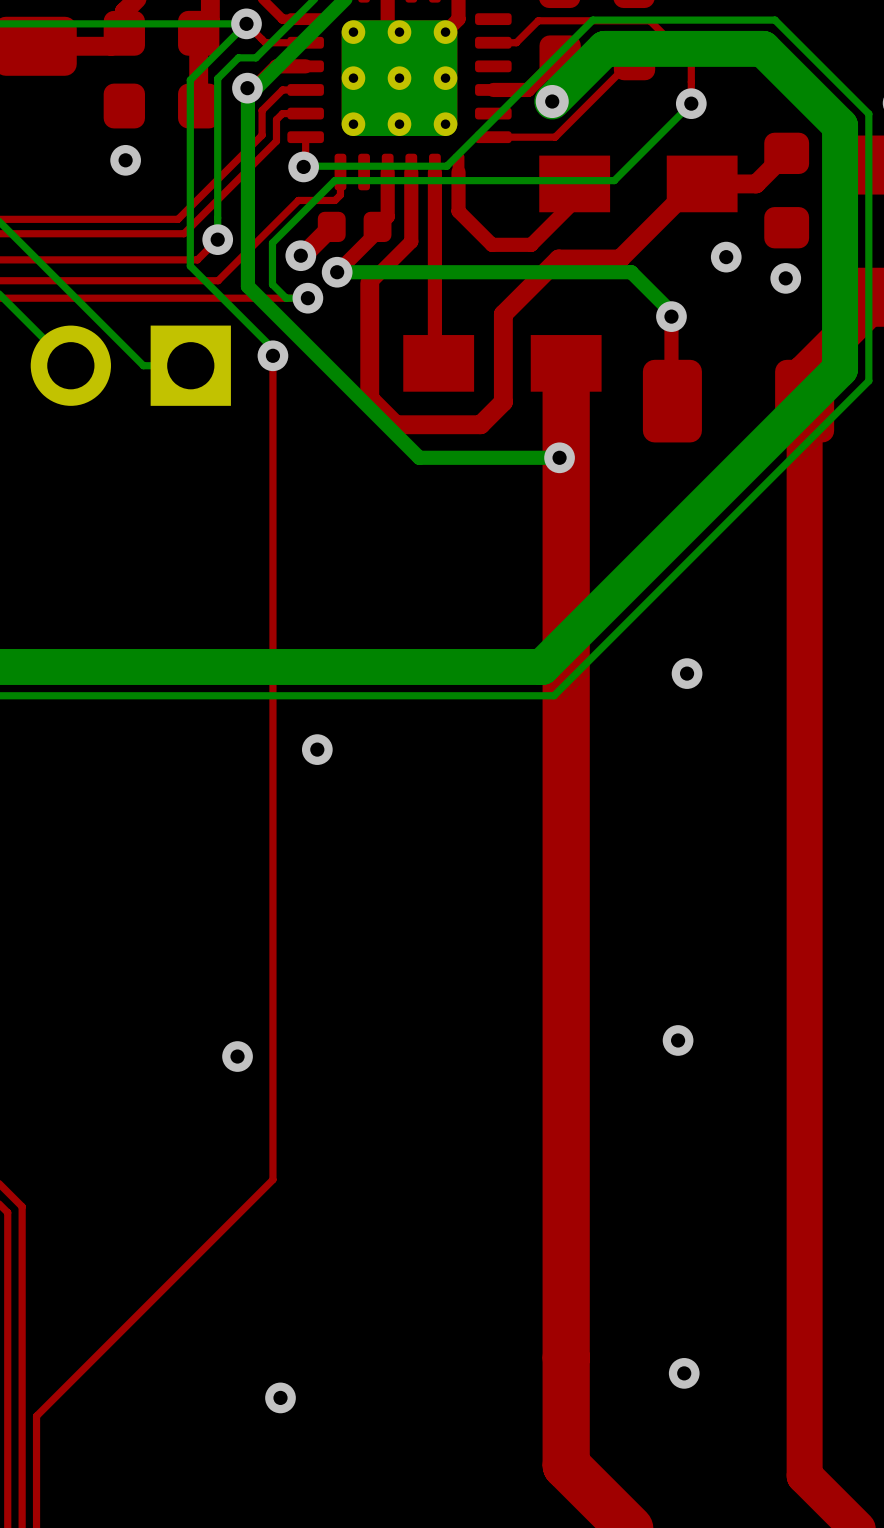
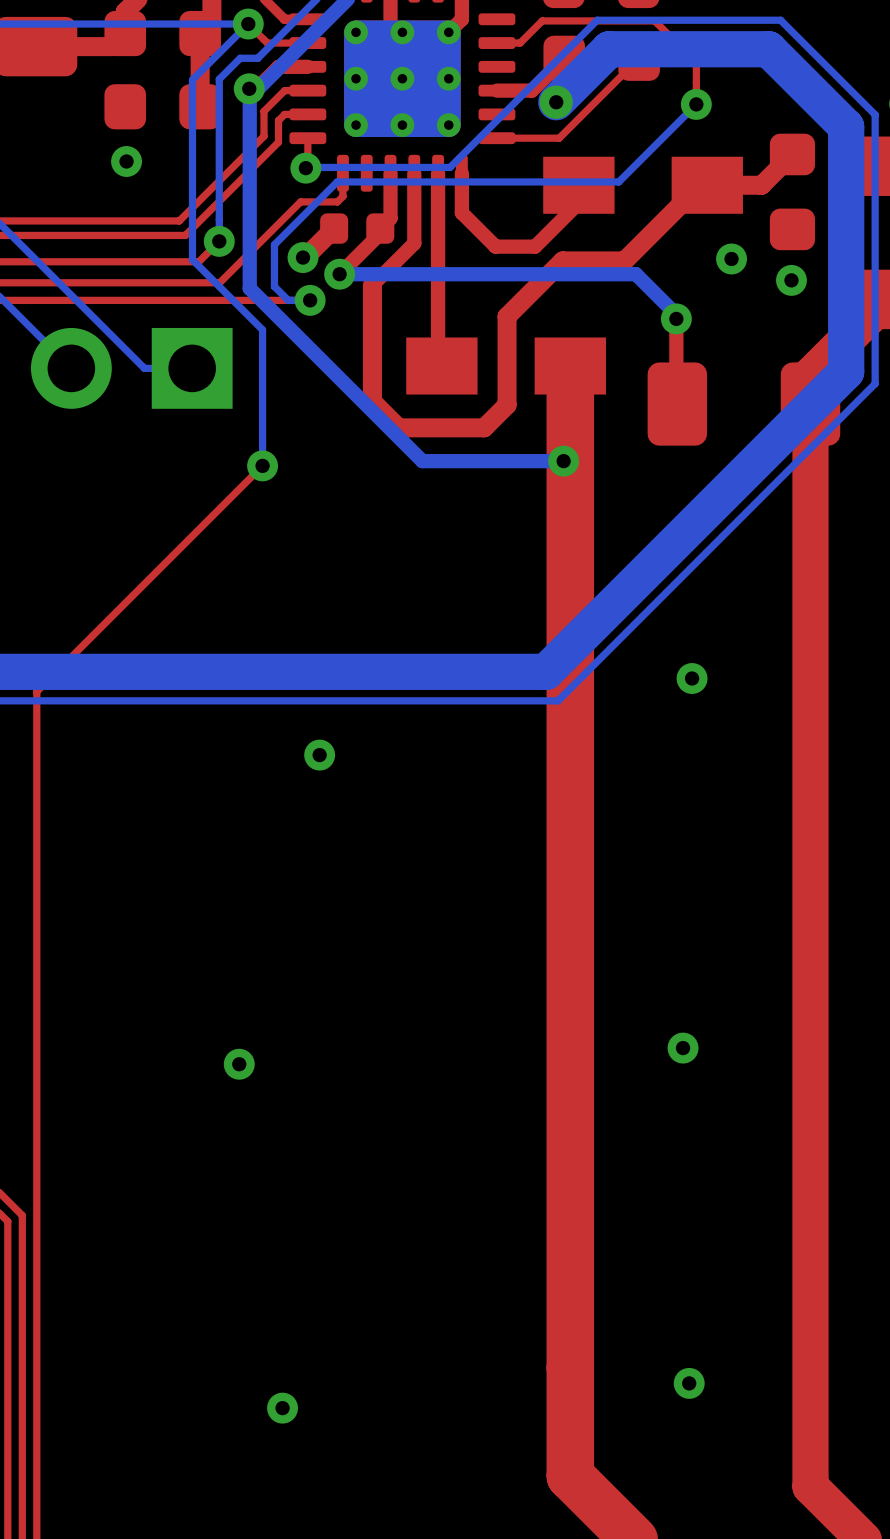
bottom track: (191, 79) (190, 266) (272, 348) (272, 355) -> (192, 79) (192, 259) (262, 329) (262, 465)
top track: (272, 355) (272, 1179) (36, 1416) -> (262, 465) (36, 691) (36, 1426)
via position: (272, 355) -> (262, 465)

